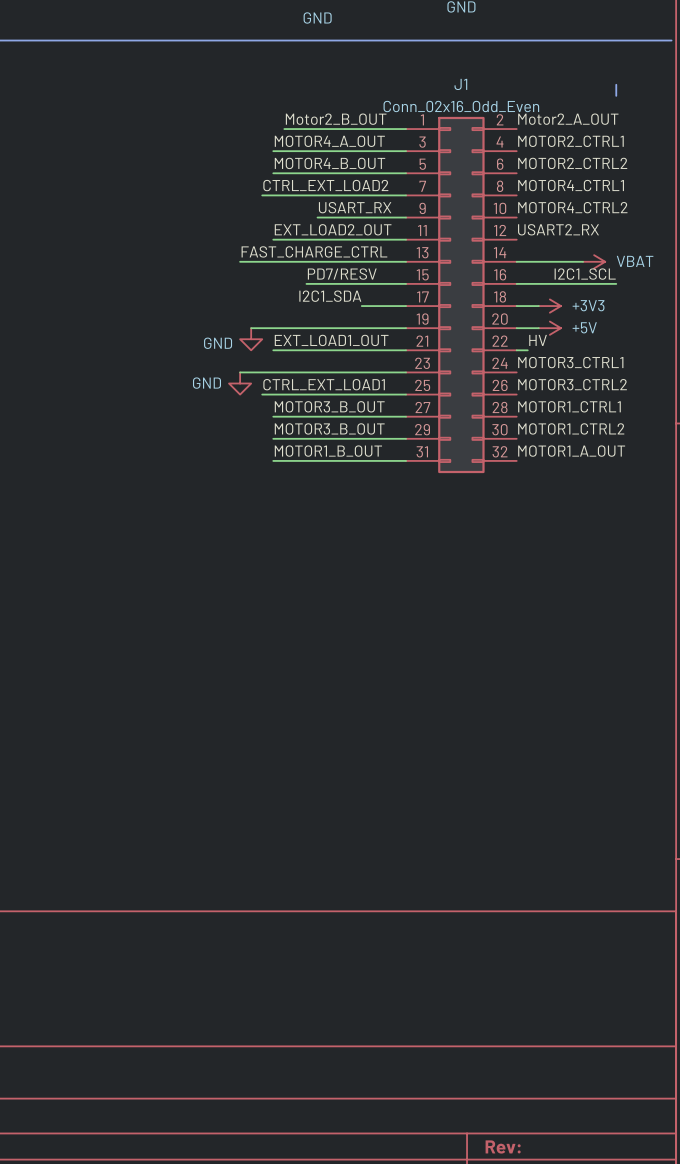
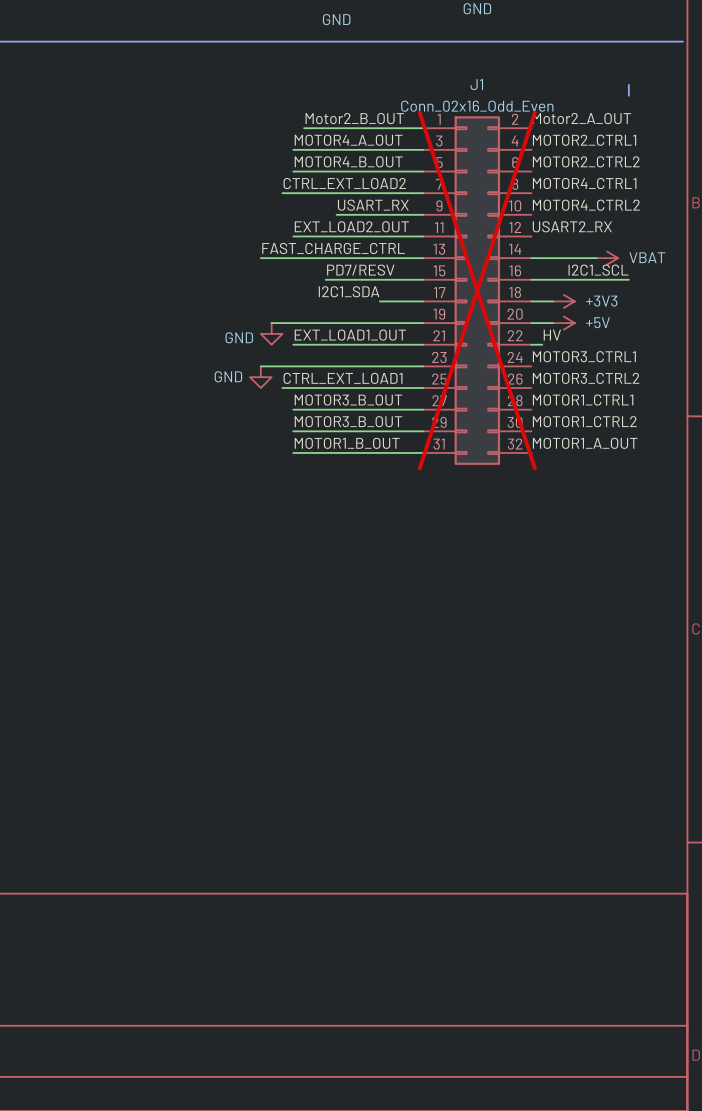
J1 do-not-place cross: none -> (477, 290)

